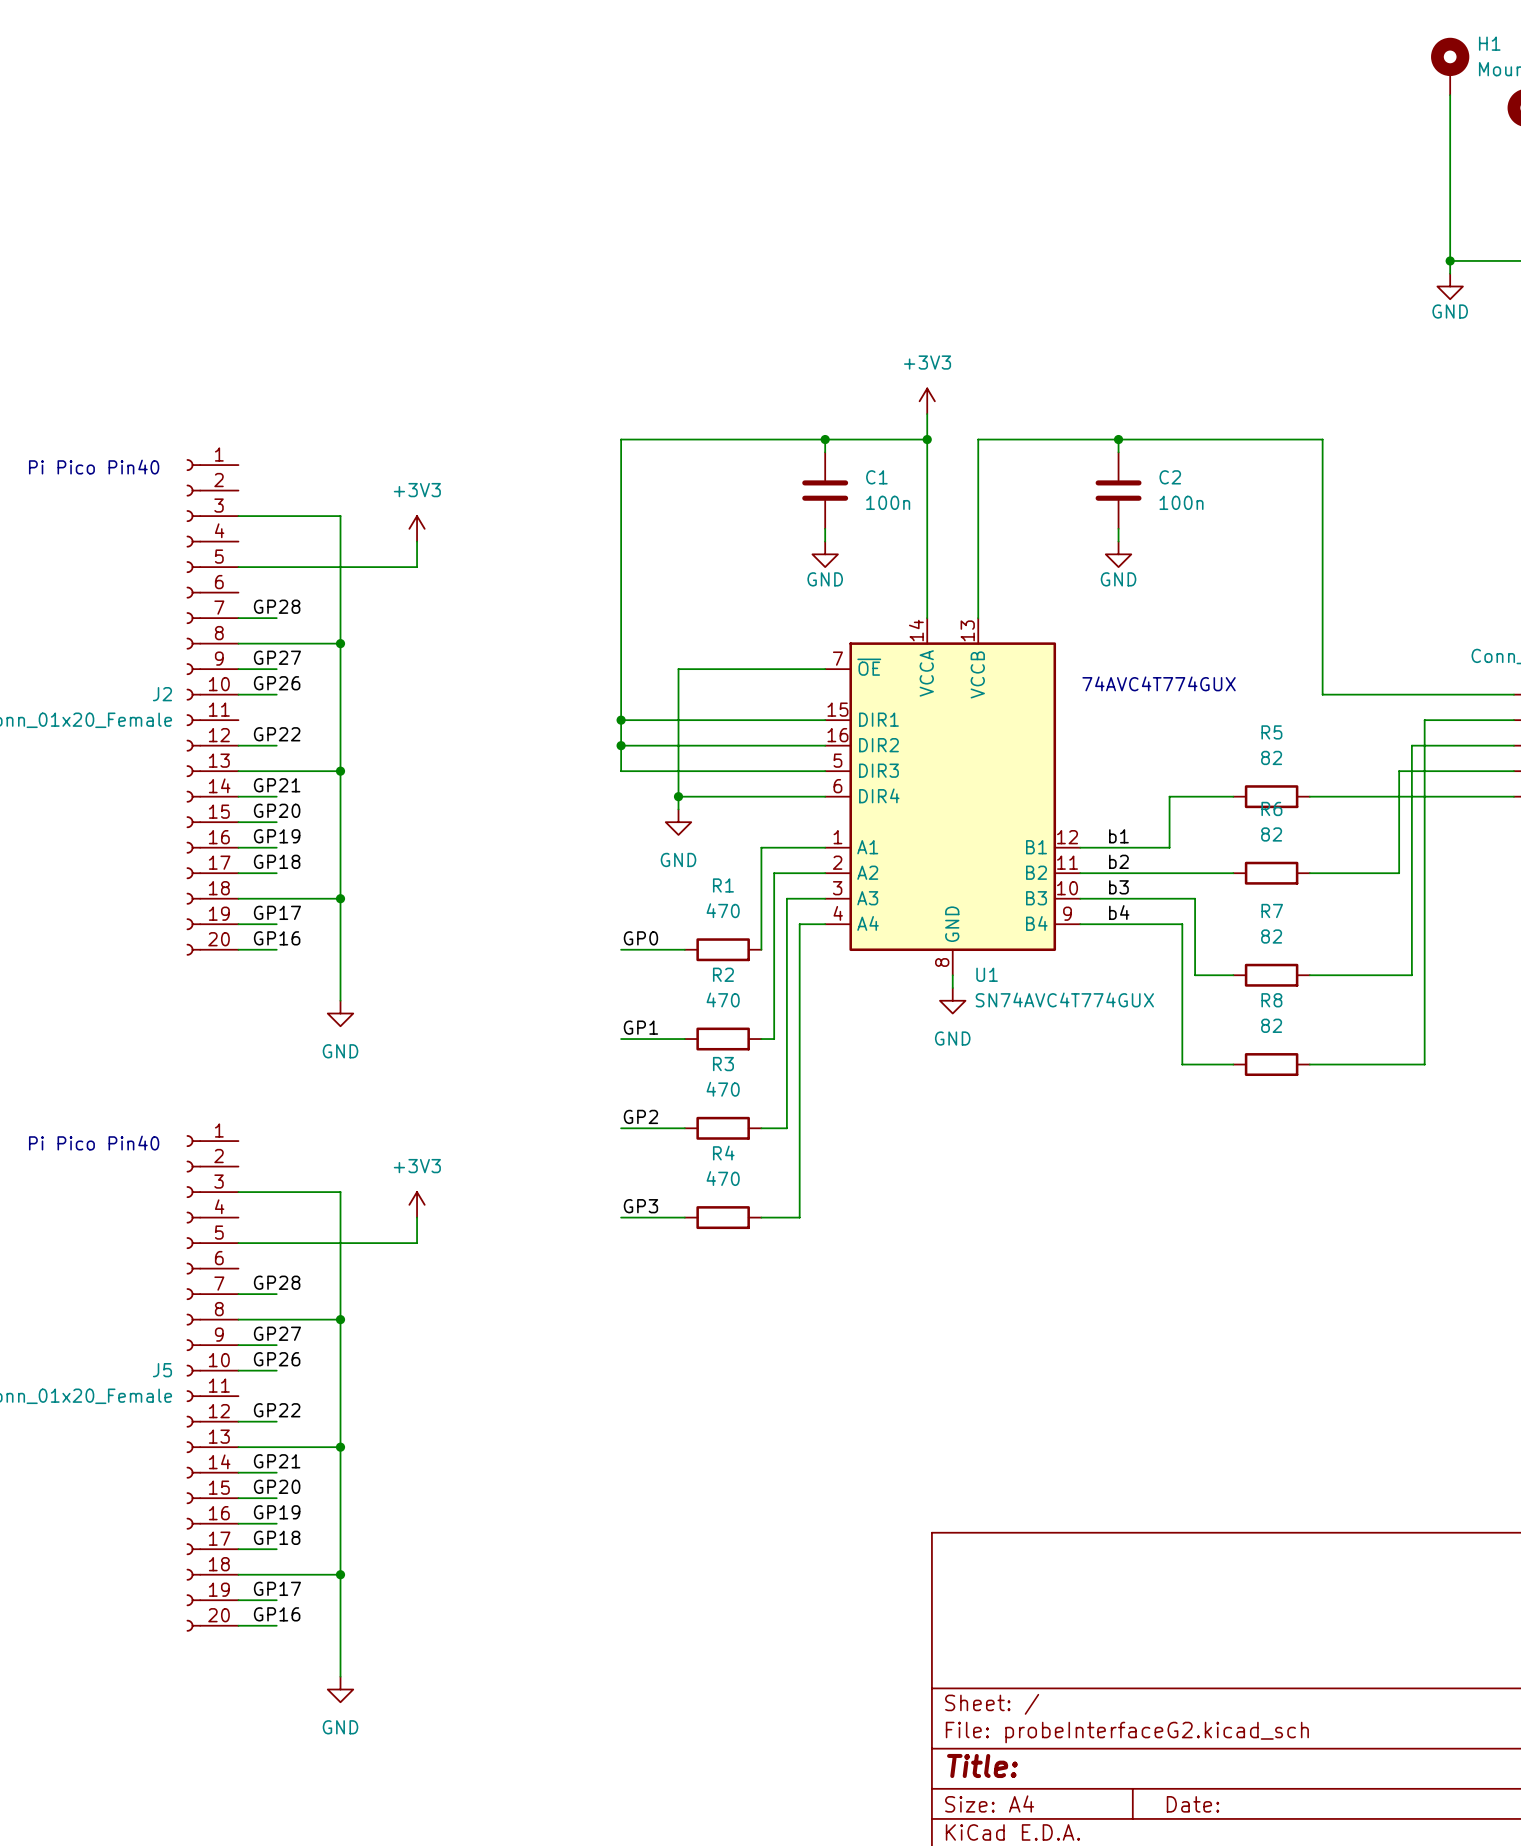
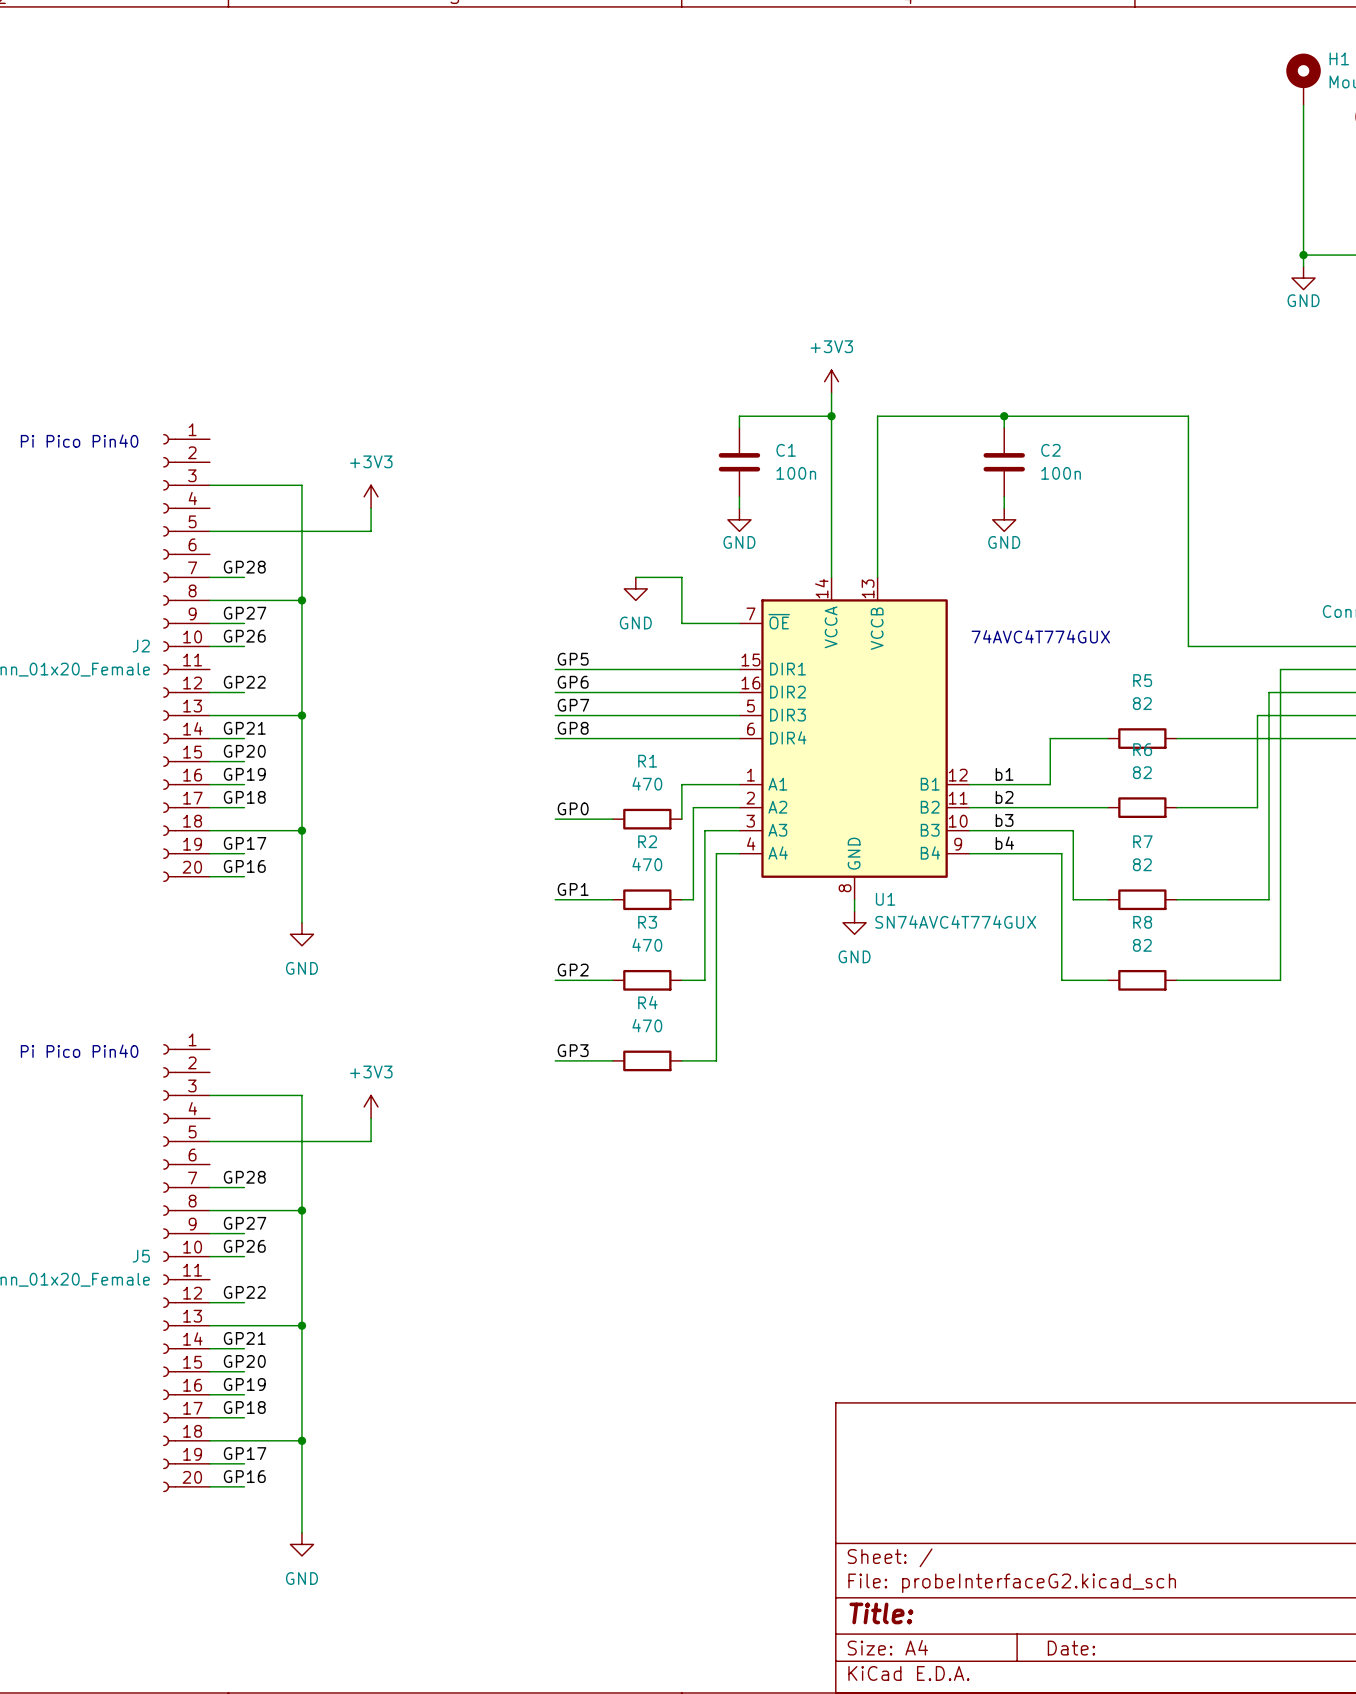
wire: (825, 439) (621, 439) (621, 771) -> none
junction: (825, 439) -> none
wire: (761, 669) (678, 669) (678, 809) -> (681, 623) (681, 577) (635, 577)
label: none -> GP5 (573, 659)
junction: (621, 720) -> none
label: none -> GP6 (573, 682)
junction: (621, 745) -> none
label: none -> GP7 (573, 705)
label: none -> GP8 (573, 728)
wire: none -> (555, 738) (607, 738)
junction: (678, 796) -> none
power symbol position: GND (678, 822) -> GND (635, 588)
wire: (761, 885) (761, 949) -> none
label position: GP0 (640, 938) -> GP0 (573, 808)
wire: (621, 949) (684, 949) -> (555, 819) (612, 819)
R1 position: (723, 949) -> (647, 819)
wire: (774, 975) (774, 1039) (761, 1039) -> (693, 899) (681, 899)
label position: GP1 (640, 1027) -> GP1 (573, 889)
wire: (621, 1039) (684, 1039) -> (555, 899) (612, 899)
R2 position: (723, 1039) -> (647, 899)
wire: (786, 1064) (786, 1128) (761, 1128) -> (704, 980) (681, 980)
label position: GP2 (640, 1116) -> GP2 (573, 970)
wire: (621, 1128) (684, 1128) -> (555, 980) (612, 980)
R3 position: (723, 1128) -> (647, 980)
wire: (799, 1153) (799, 1217) (761, 1217) -> (716, 1060) (681, 1060)
label position: GP3 (640, 1206) -> GP3 (573, 1050)
wire: (621, 1217) (684, 1217) -> (555, 1060) (612, 1060)
R4 position: (723, 1217) -> (647, 1060)

